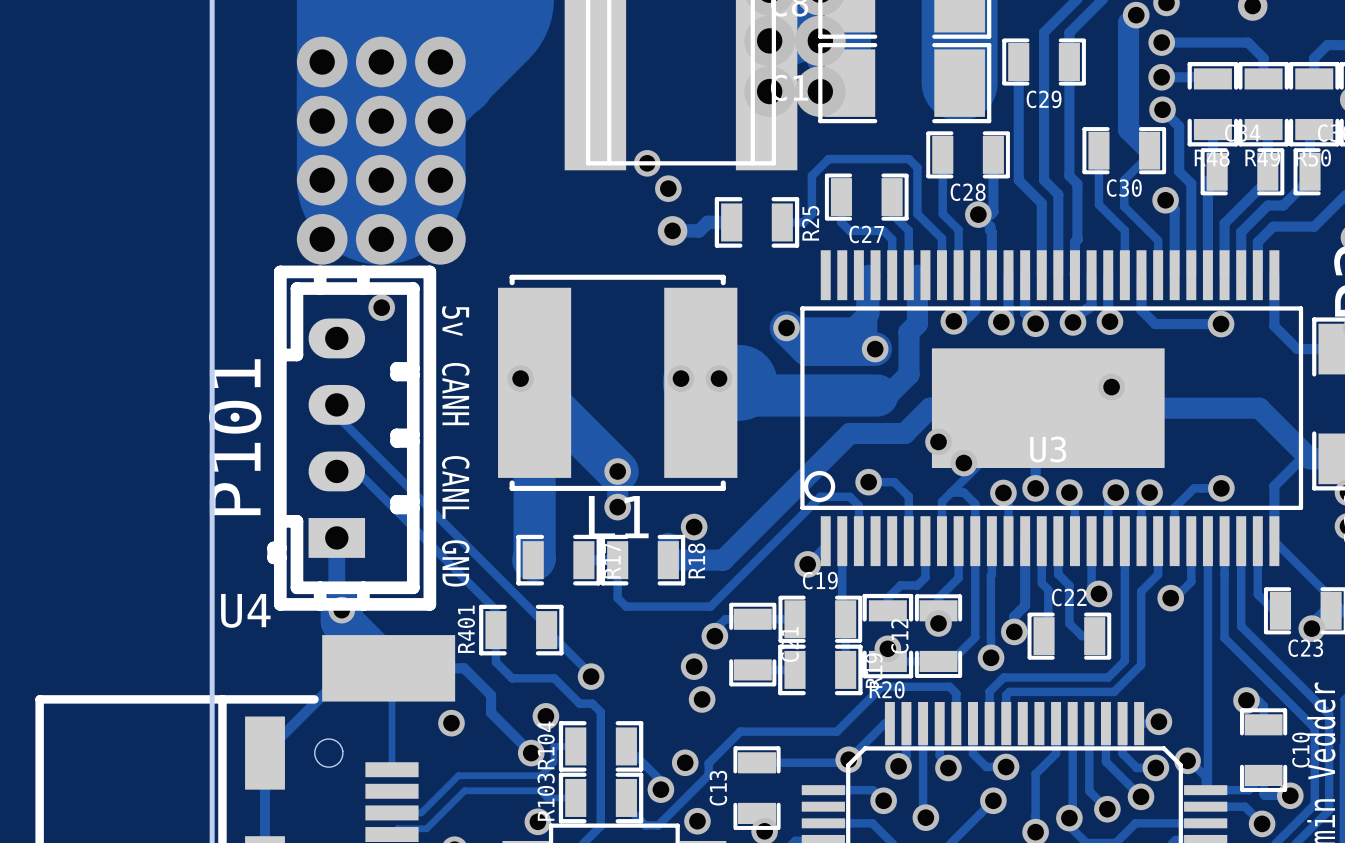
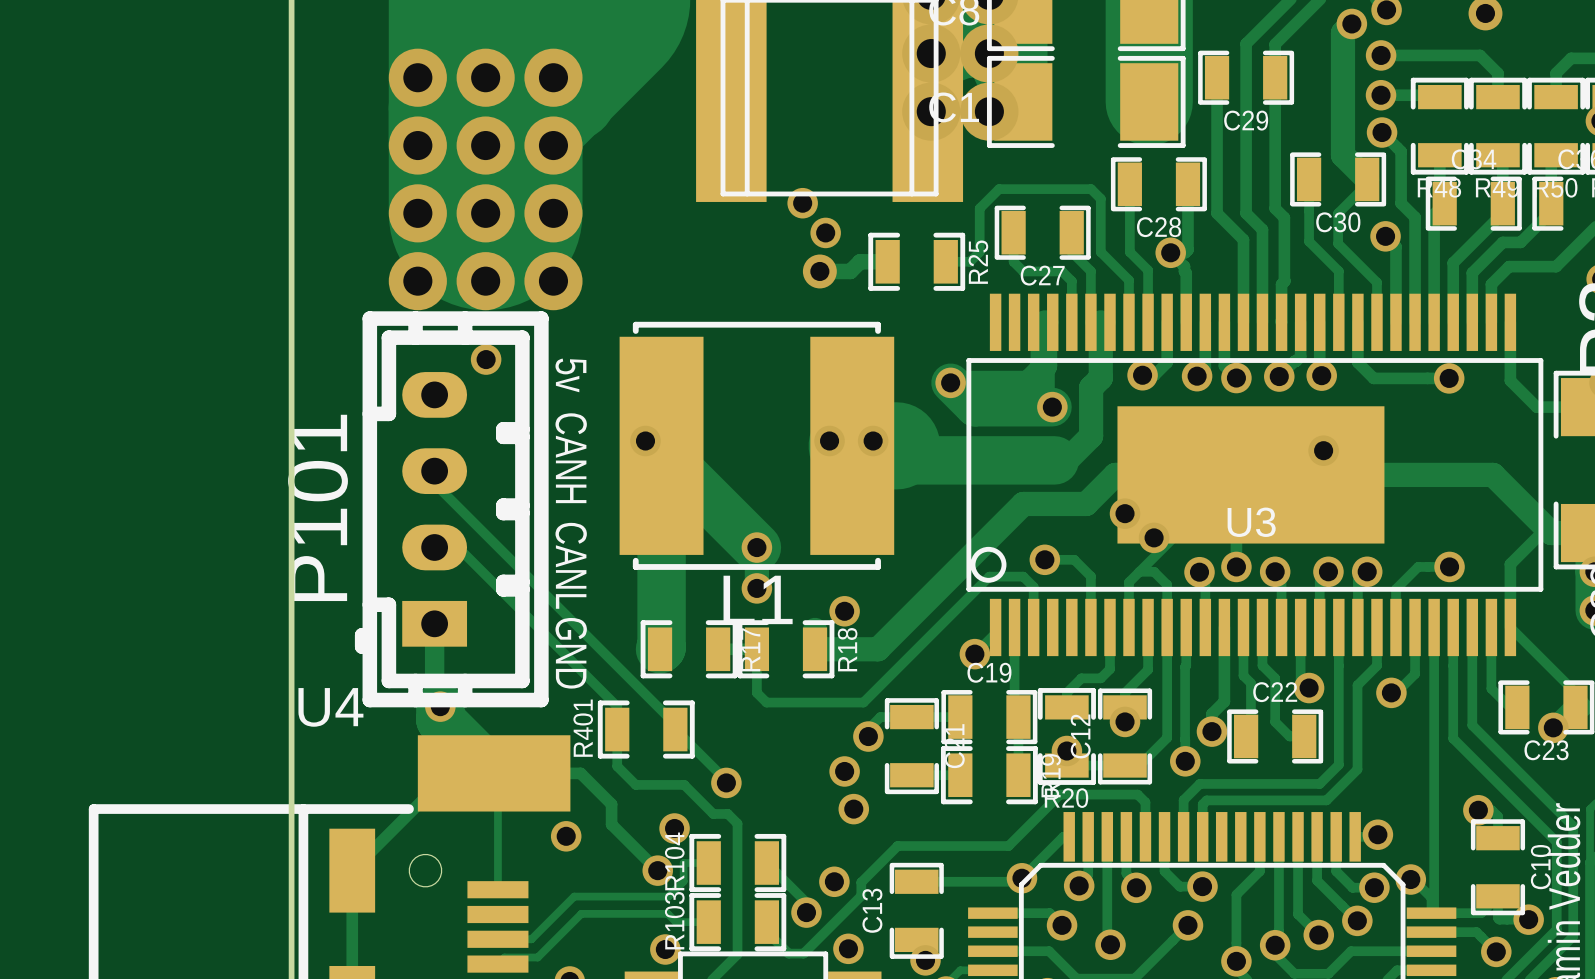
via: (647, 163) -> none
via: none -> (802, 203)
via: (668, 188) -> none
via: none -> (825, 232)

